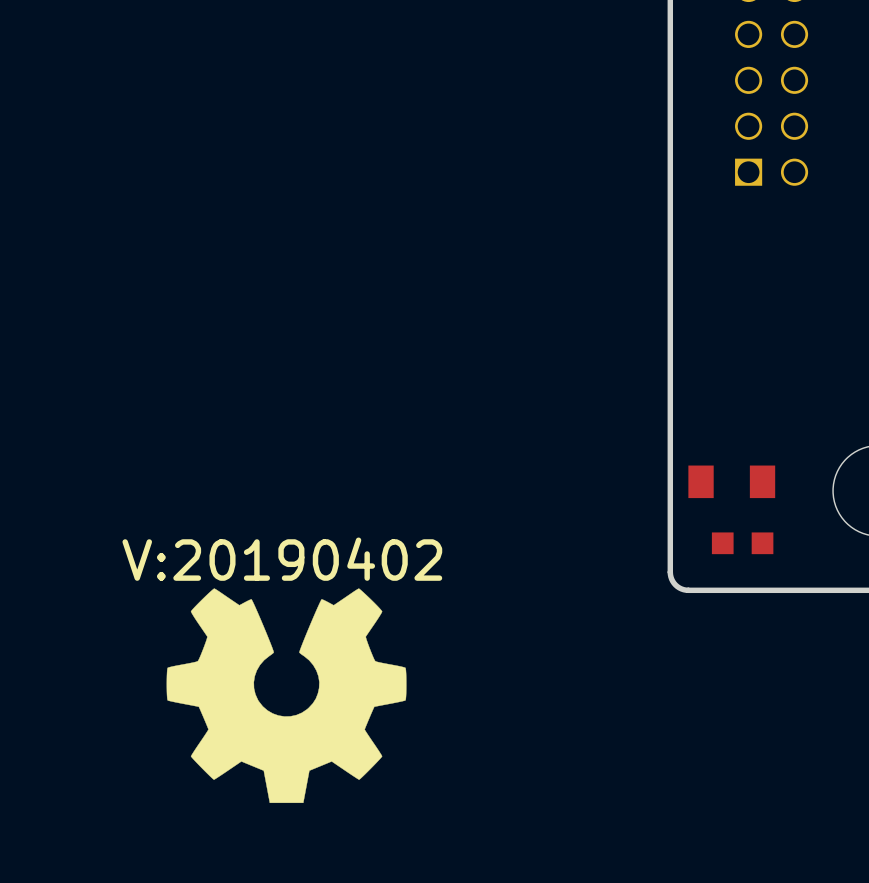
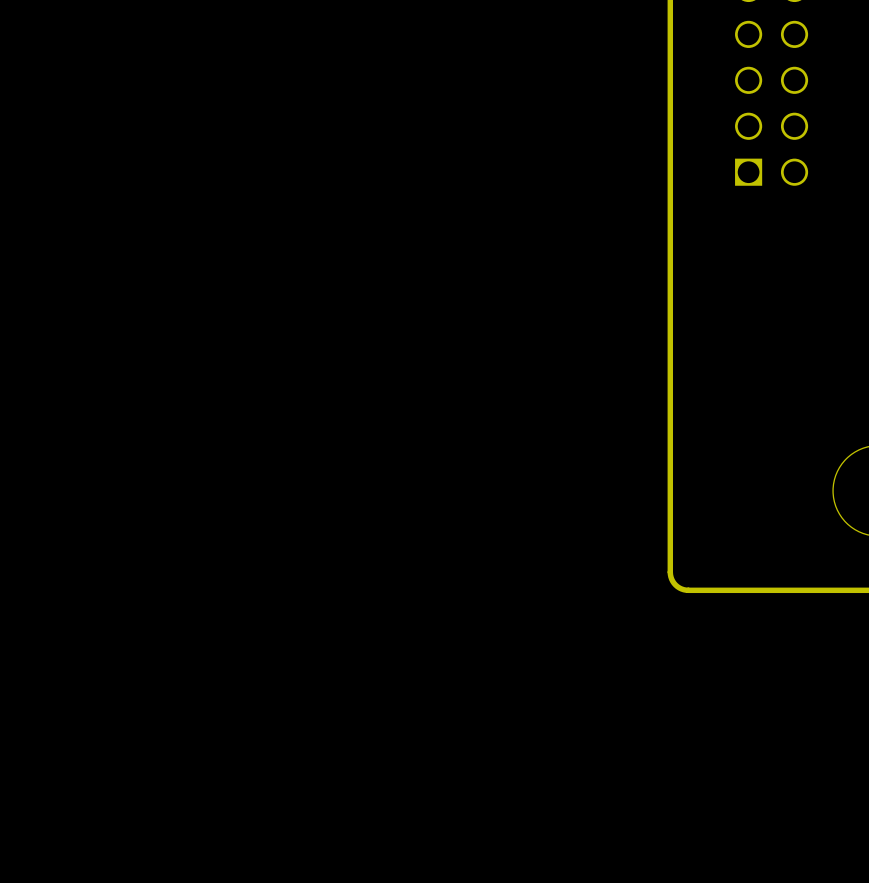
part: (731, 481) -> none
part: (742, 543) -> none
drawing: [166, 588, 407, 804] -> none

